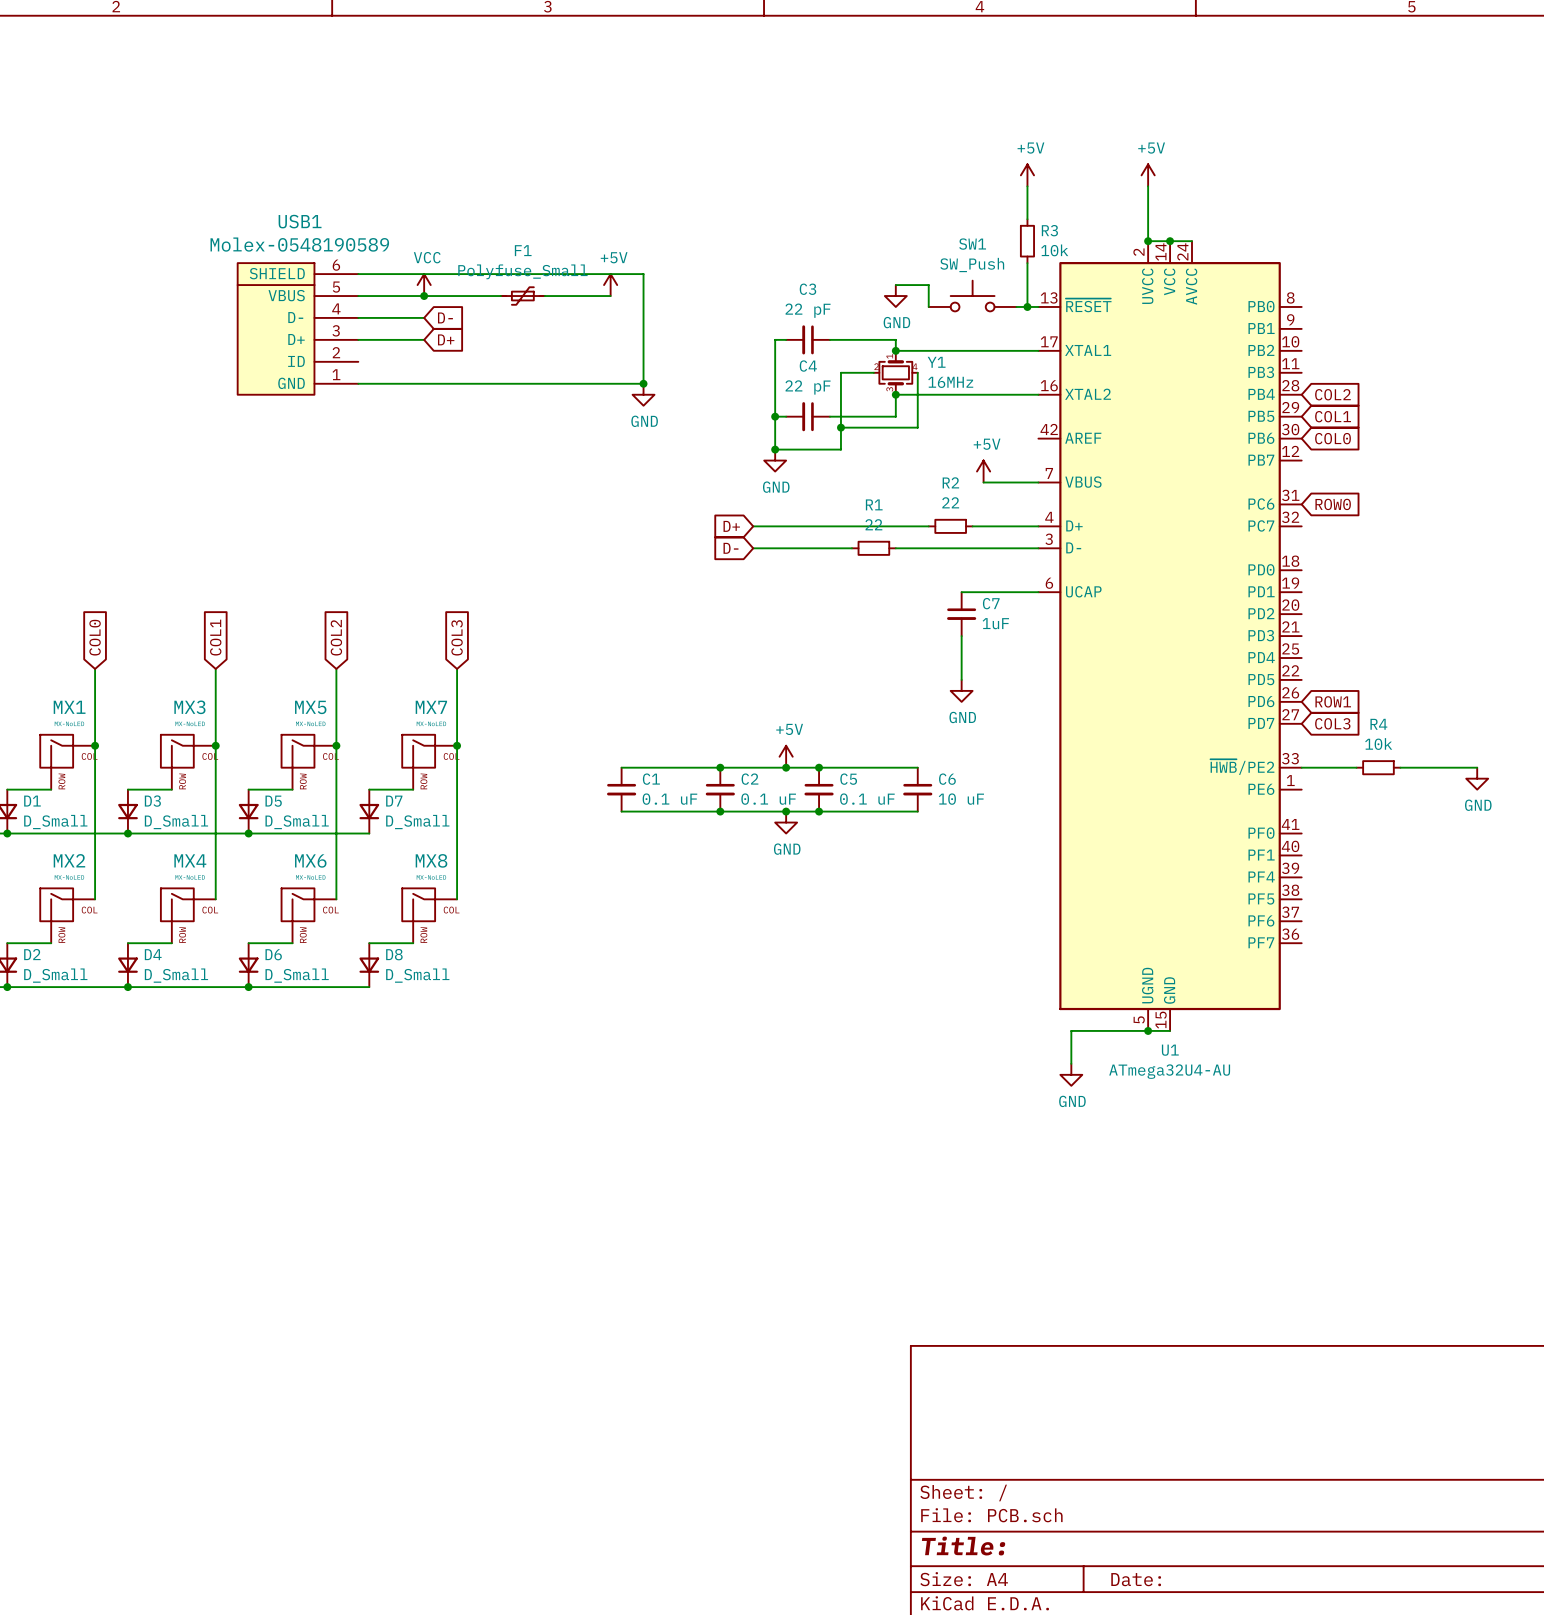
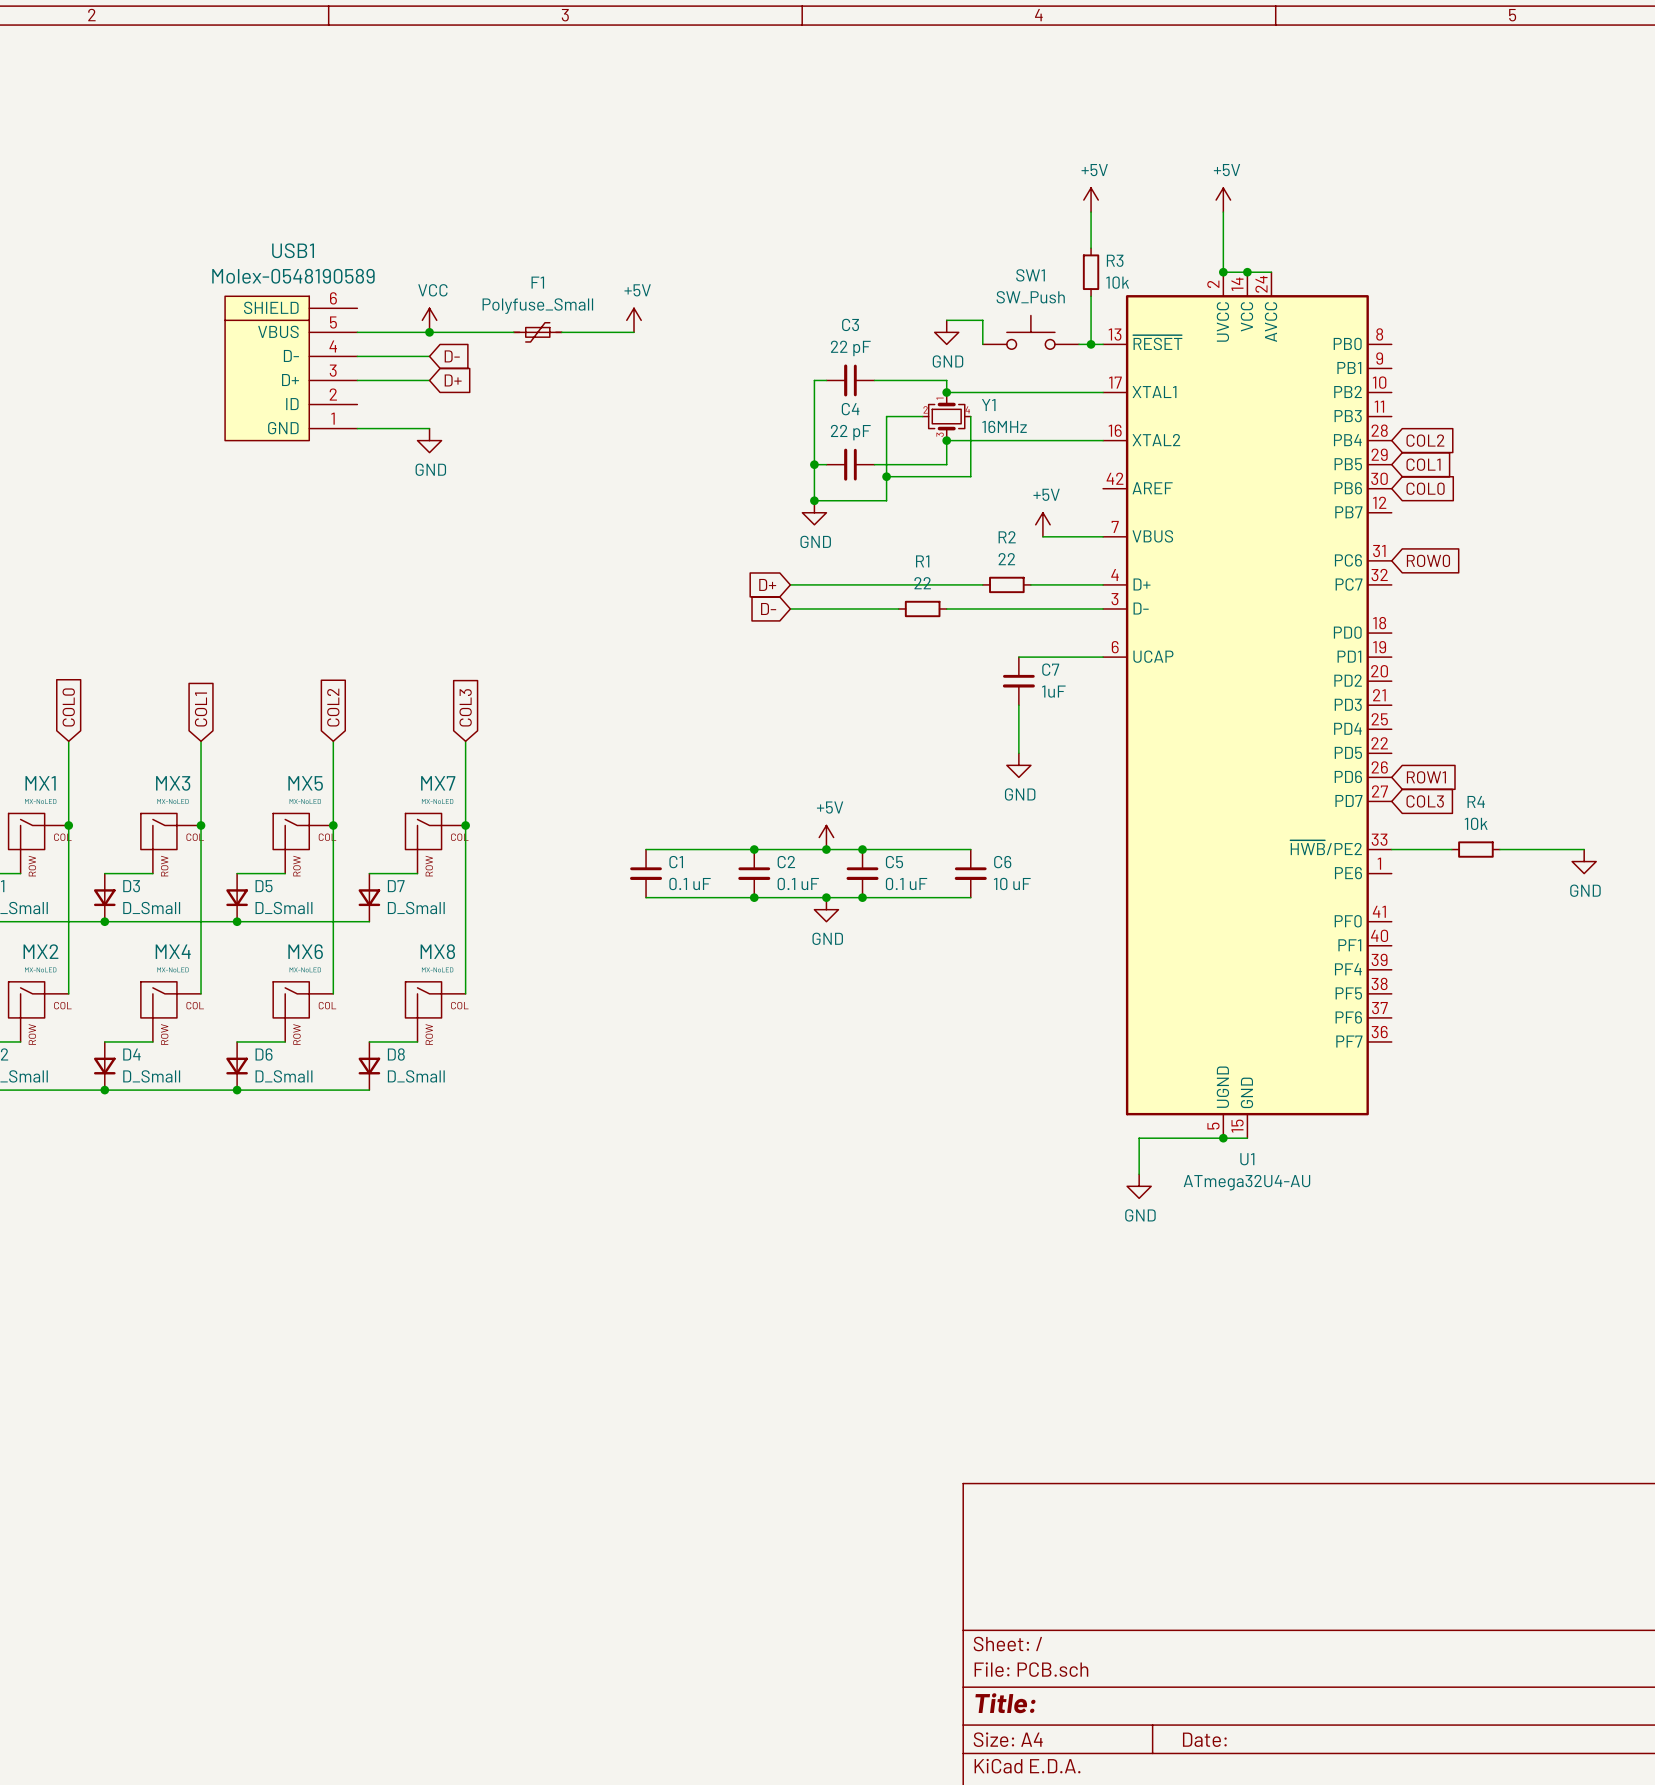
wire: (358, 274) (643, 274) (643, 383) (424, 383) -> none
junction: (643, 383) -> none
power symbol: none -> GND (429, 440)
power symbol: GND (643, 394) -> none

